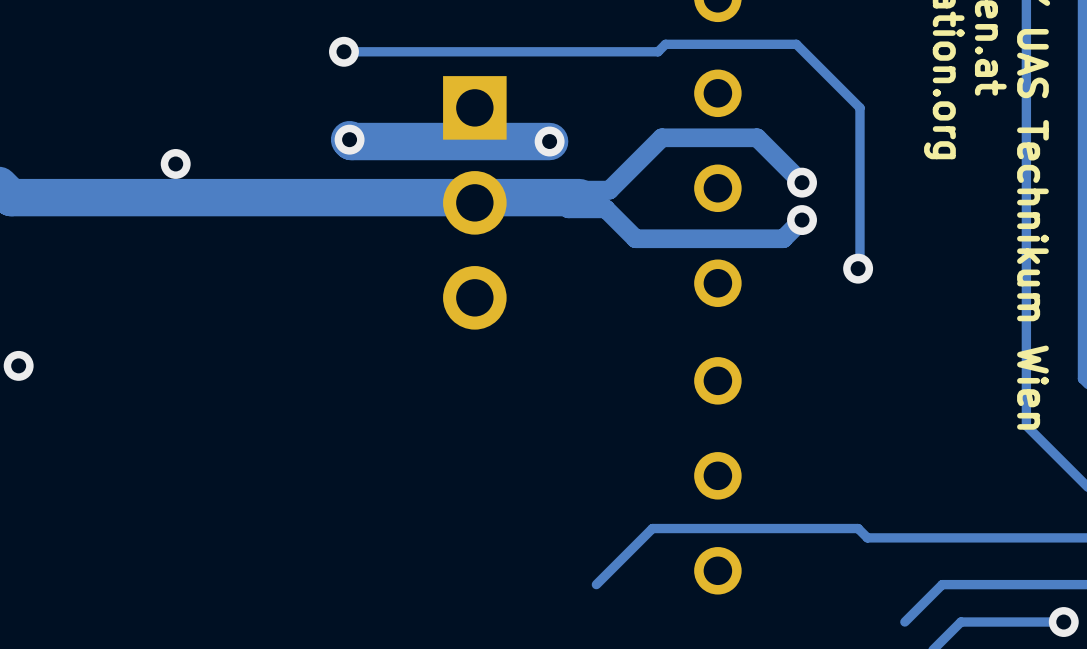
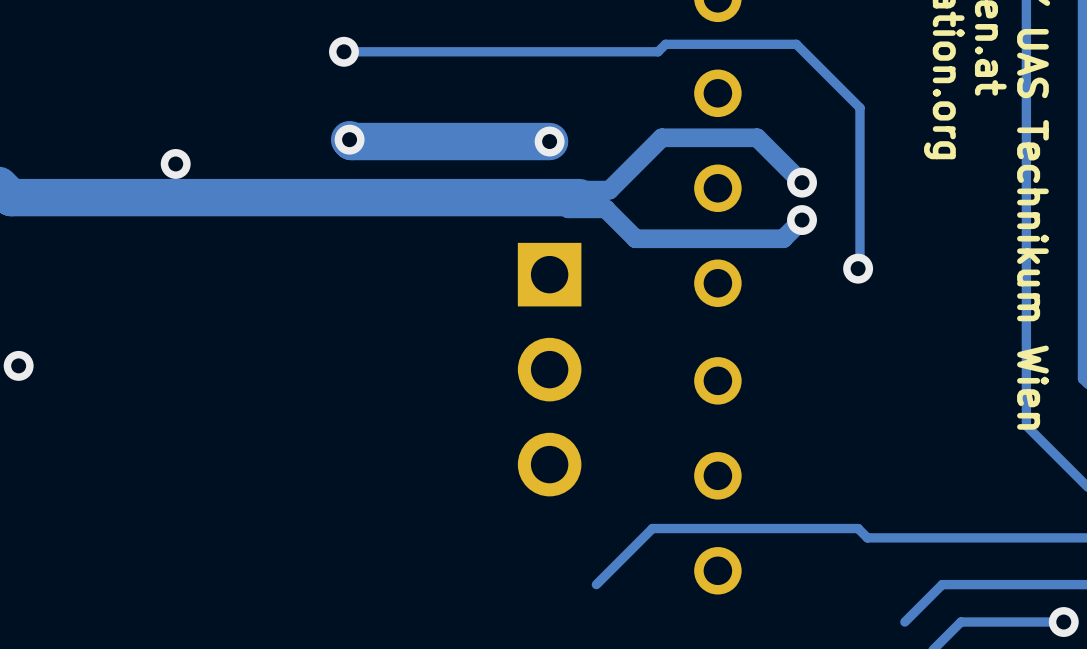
part position: (474, 202) -> (549, 369)

